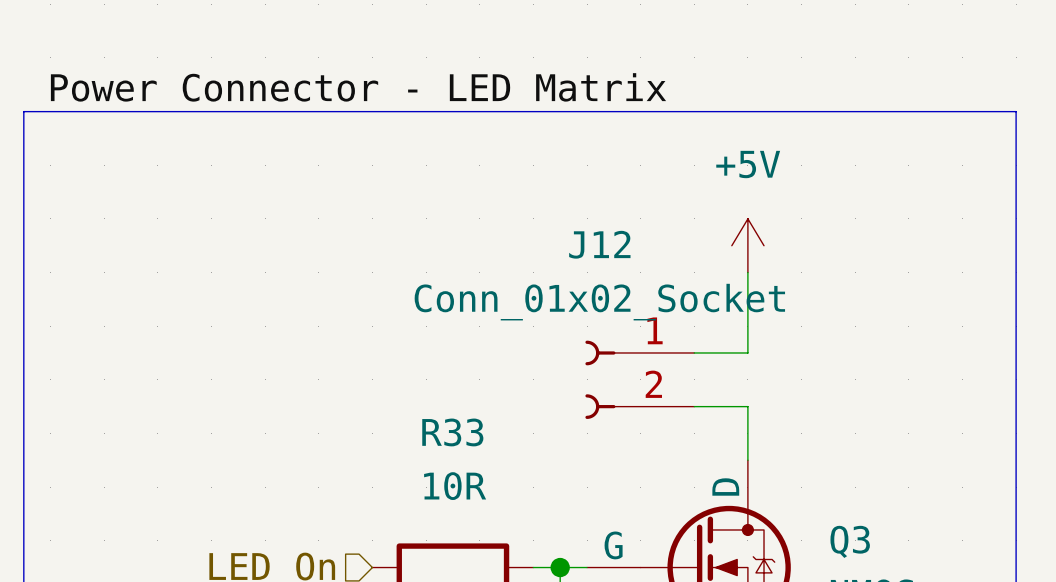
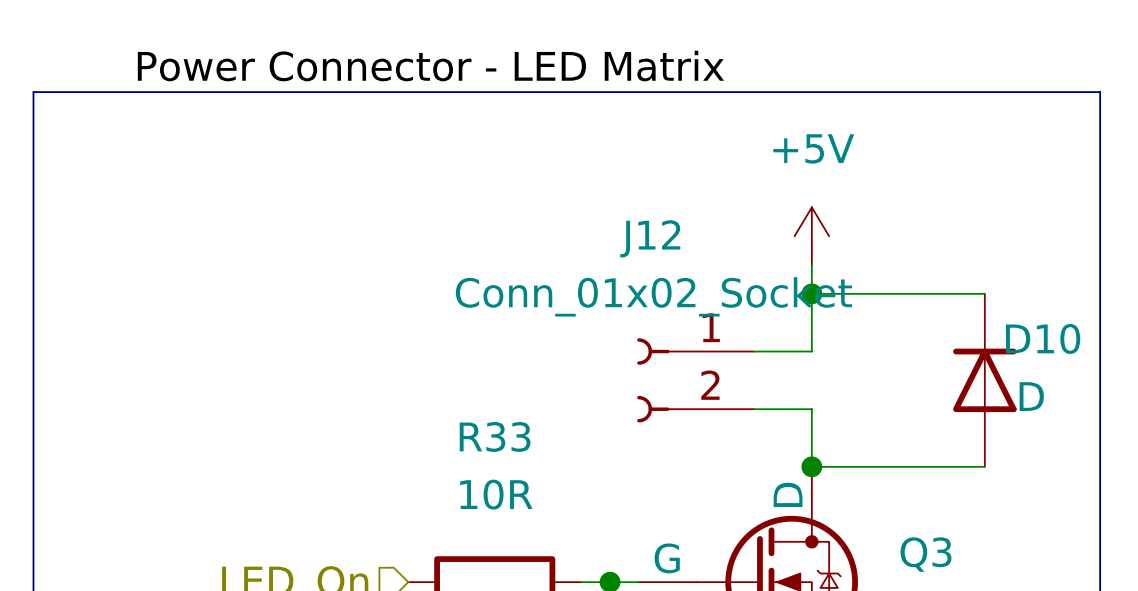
wire: none -> (811, 293) (984, 293)
junction: none -> (811, 293)
D10: none -> D (984, 380)
wire: none -> (811, 466) (984, 466)
junction: none -> (811, 466)

